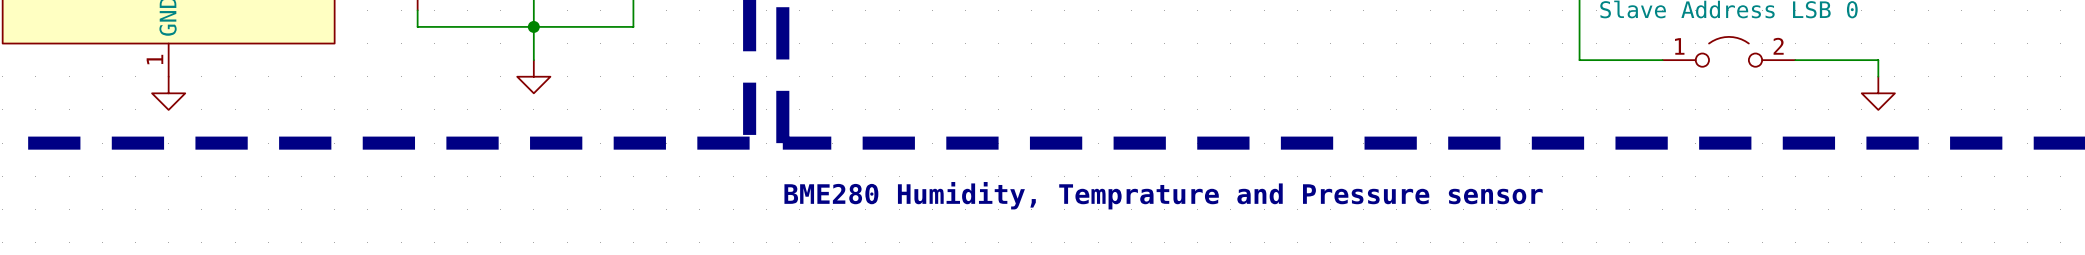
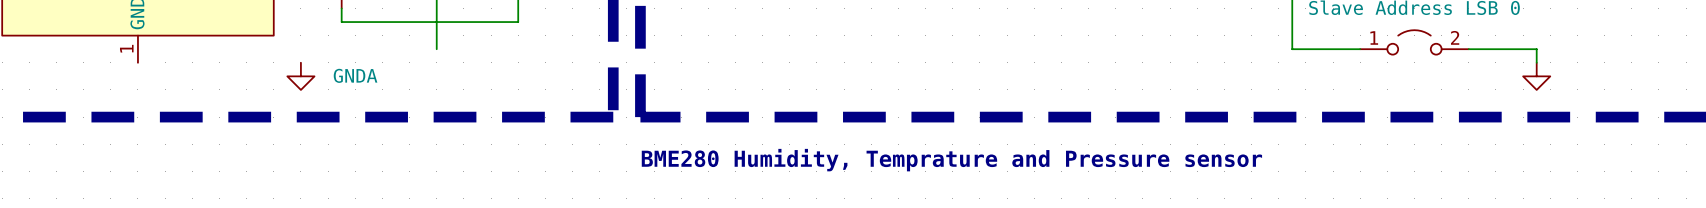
junction: (533, 26) -> none
power symbol: (533, 76) -> none
power symbol: (168, 93) -> none
power symbol: none -> GNDA (300, 76)

